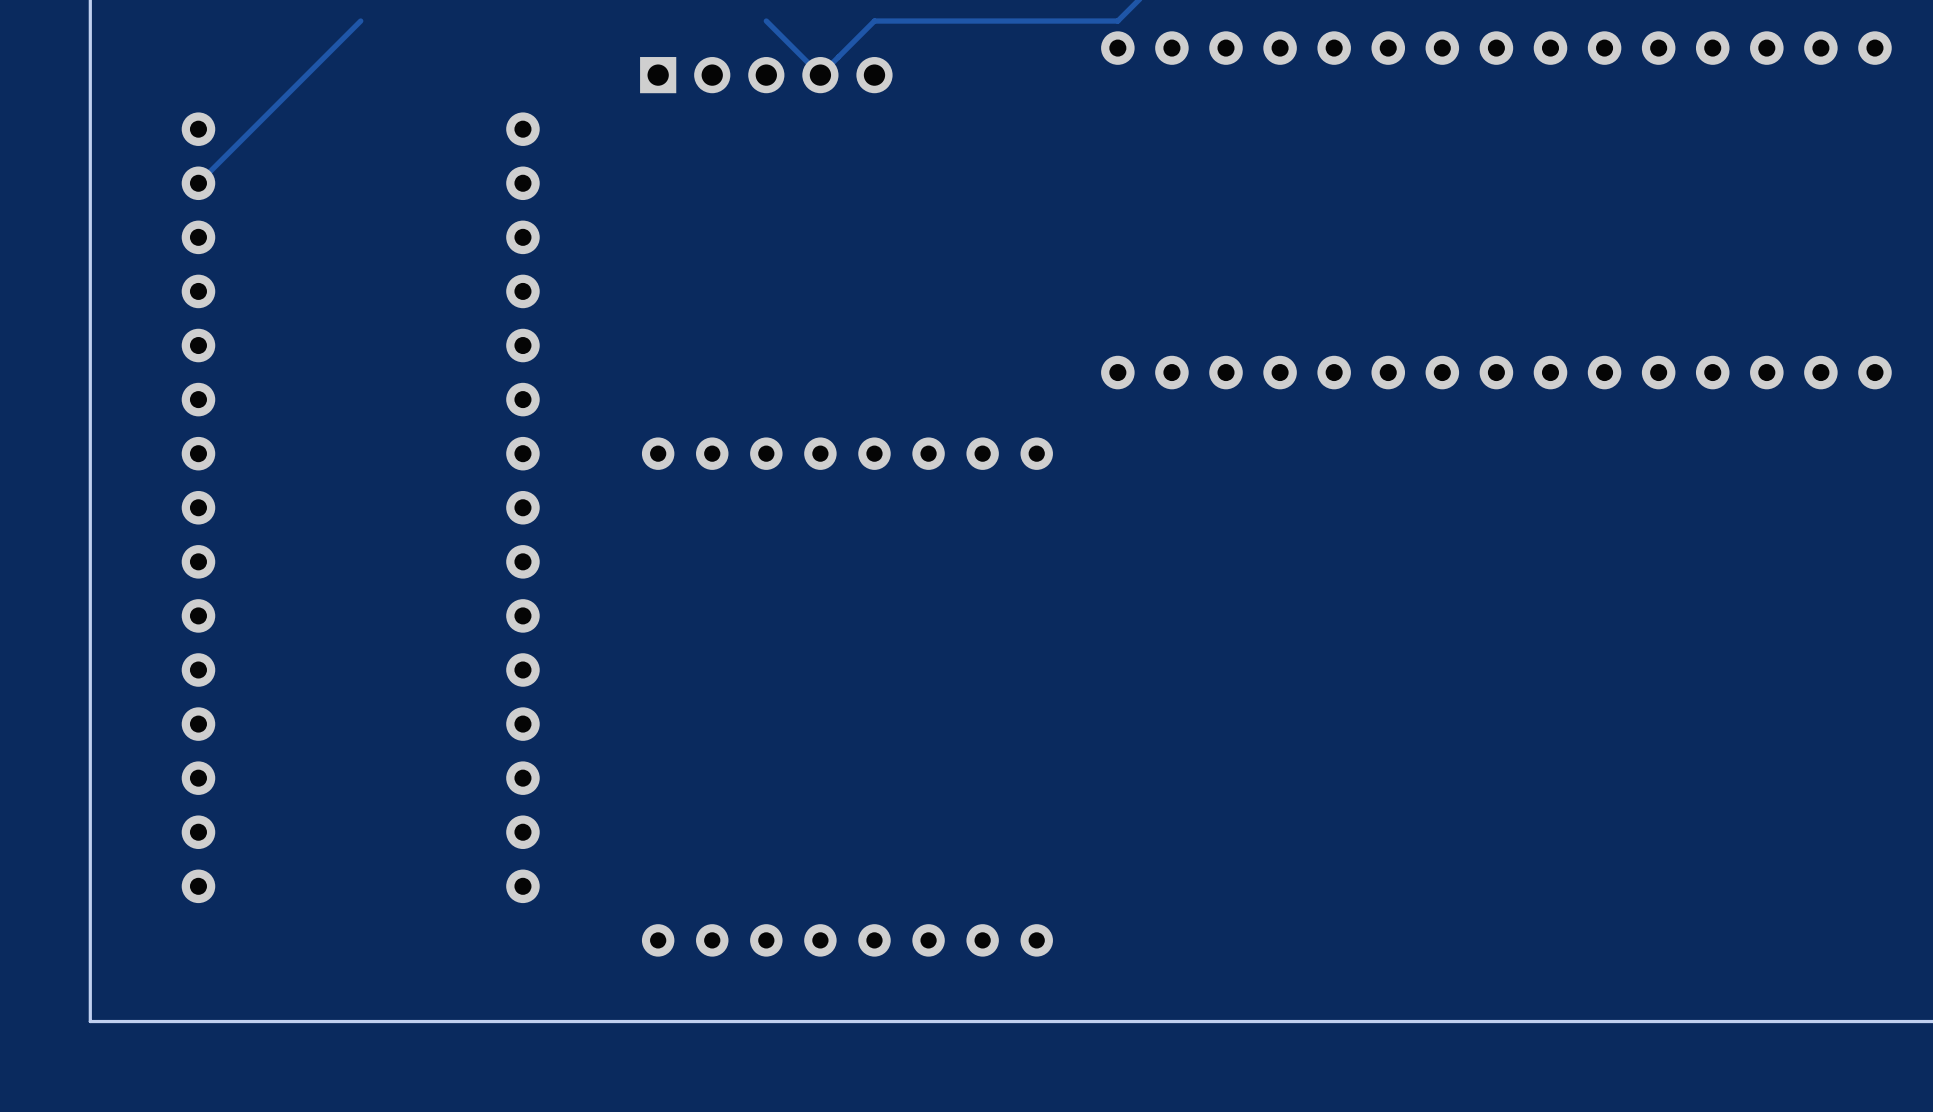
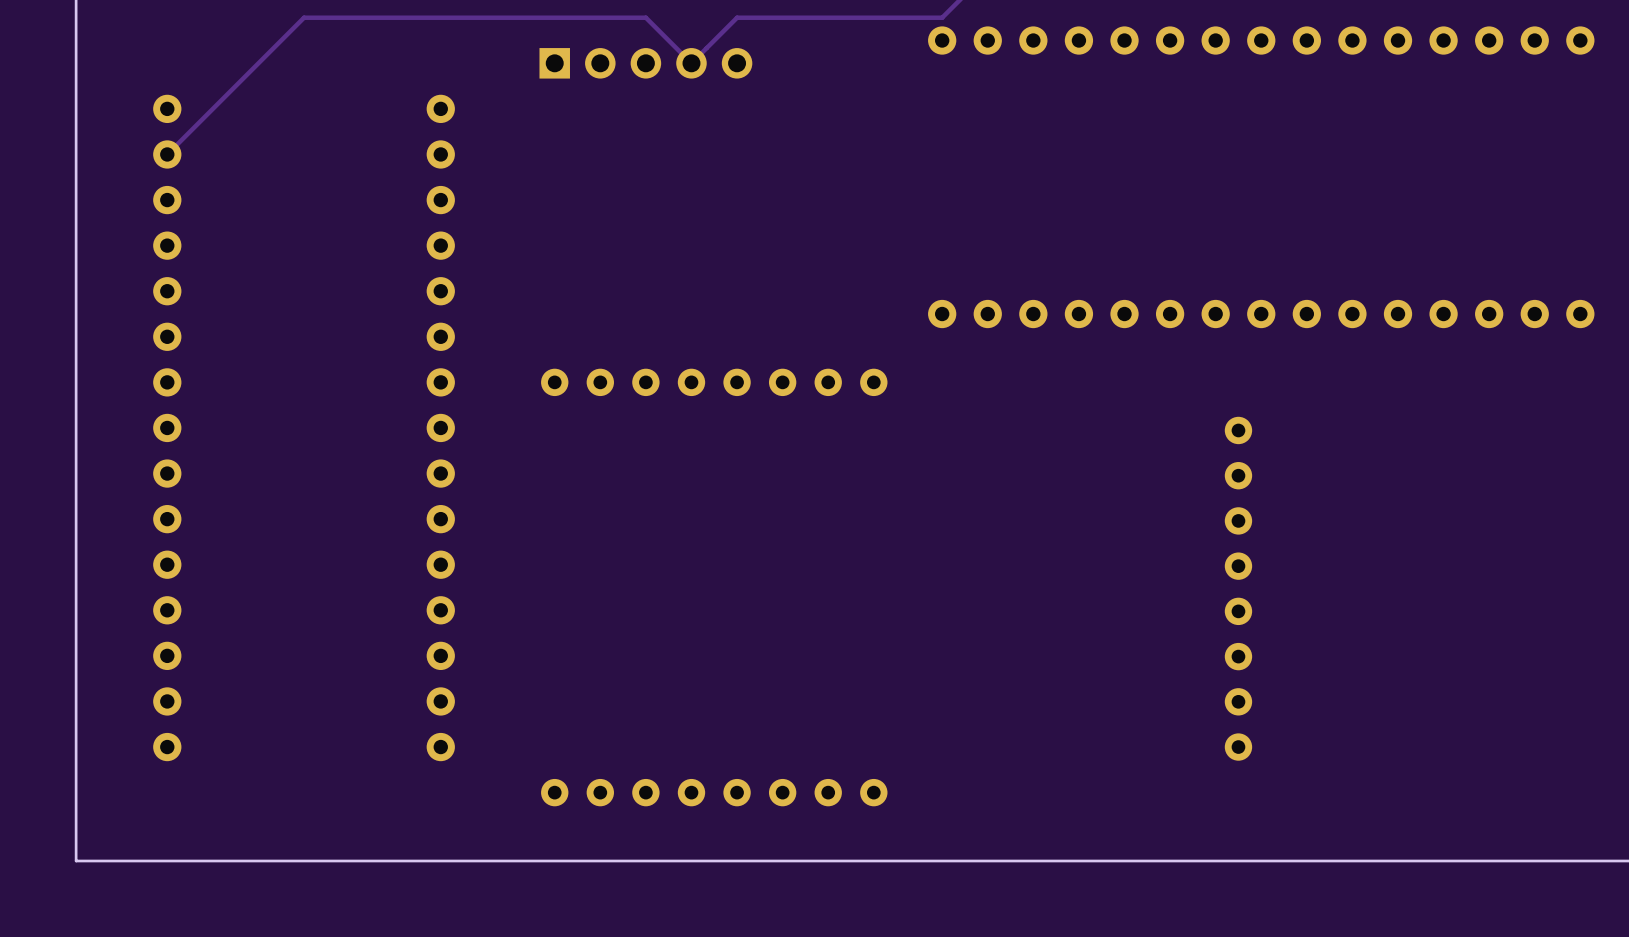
track: none -> (645, 17) (304, 17)
part: none -> (1238, 588)

